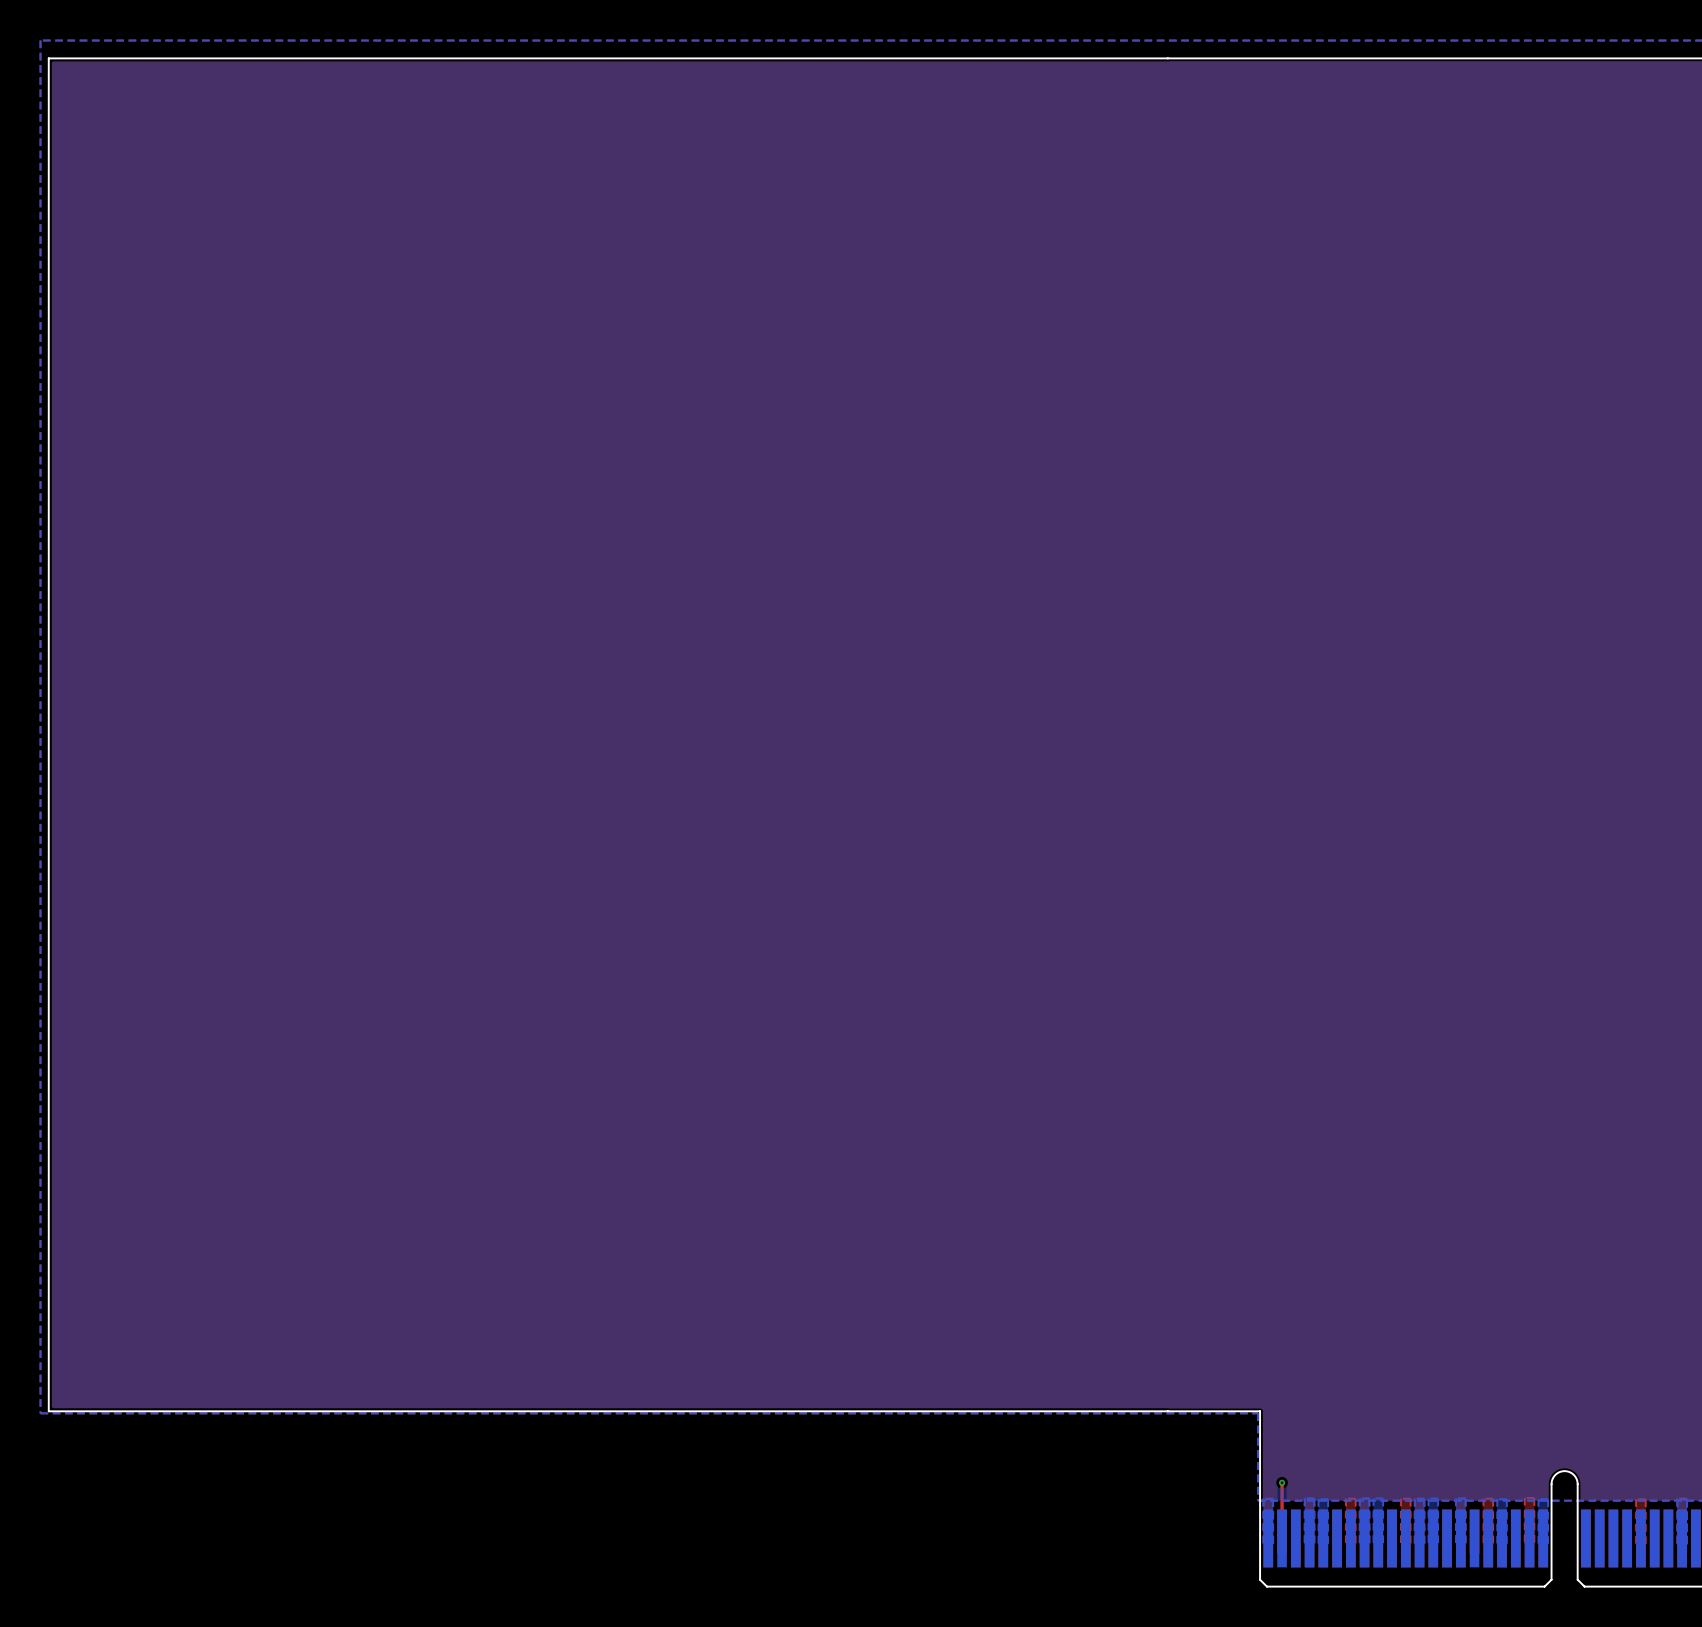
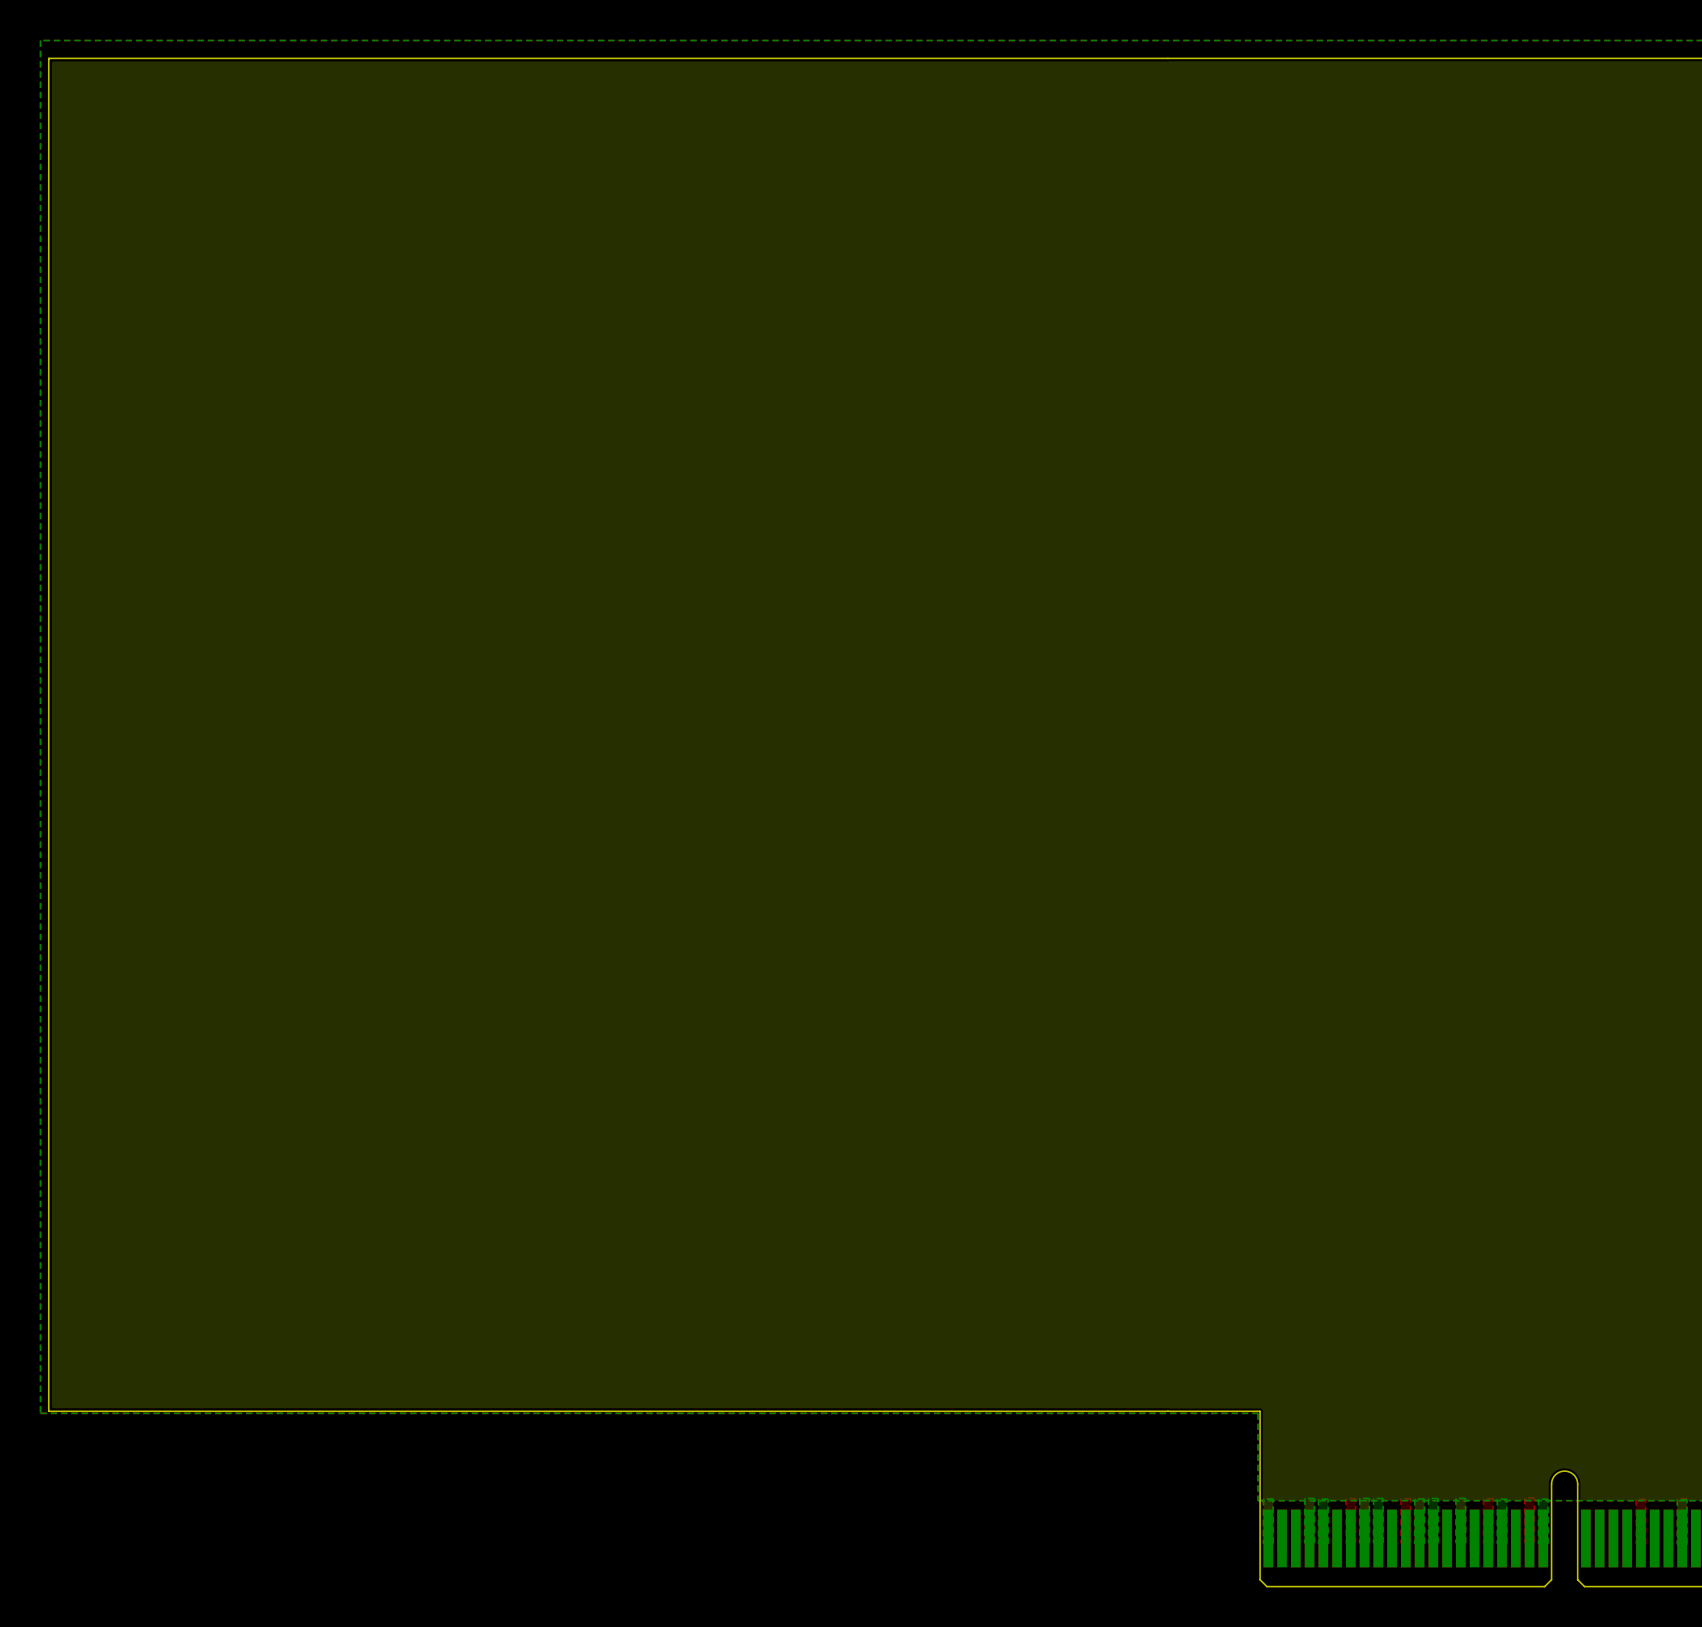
top track: (1282, 1482) (1282, 1530) -> none
via: (1282, 1482) -> none

